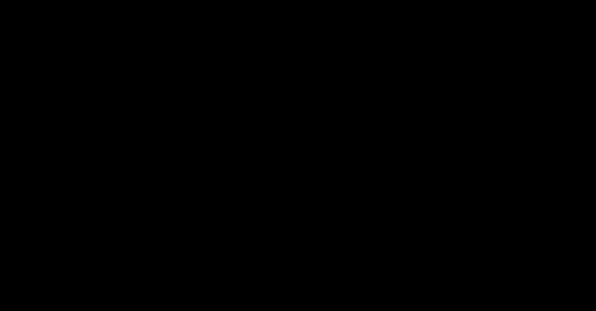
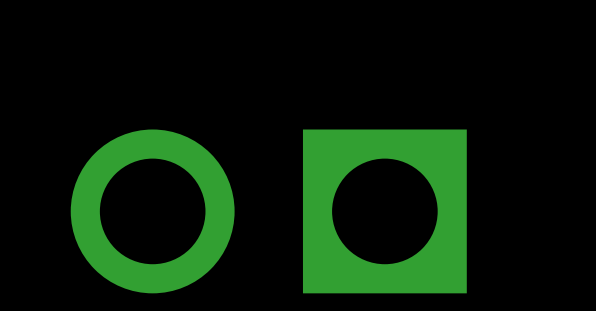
part: none -> (268, 211)

